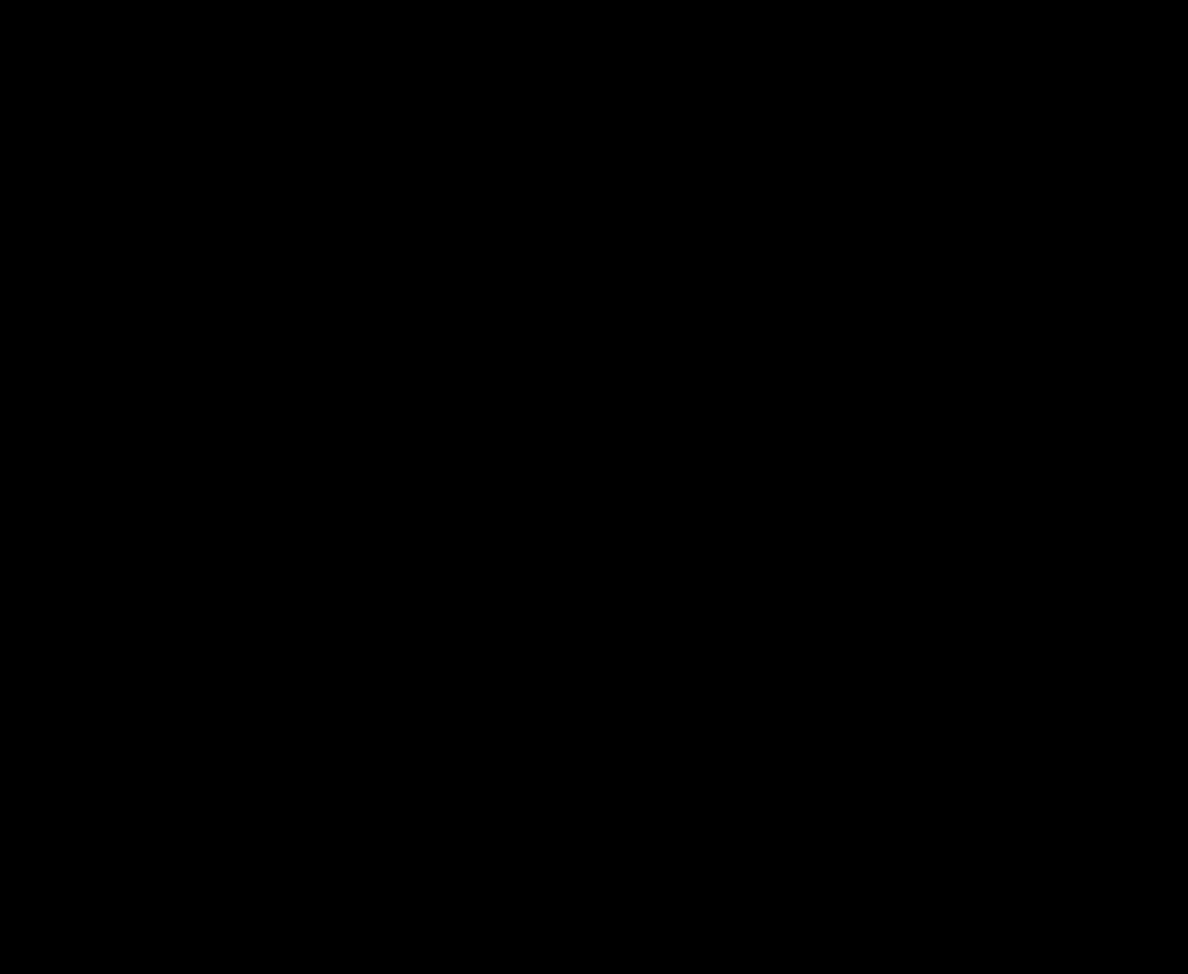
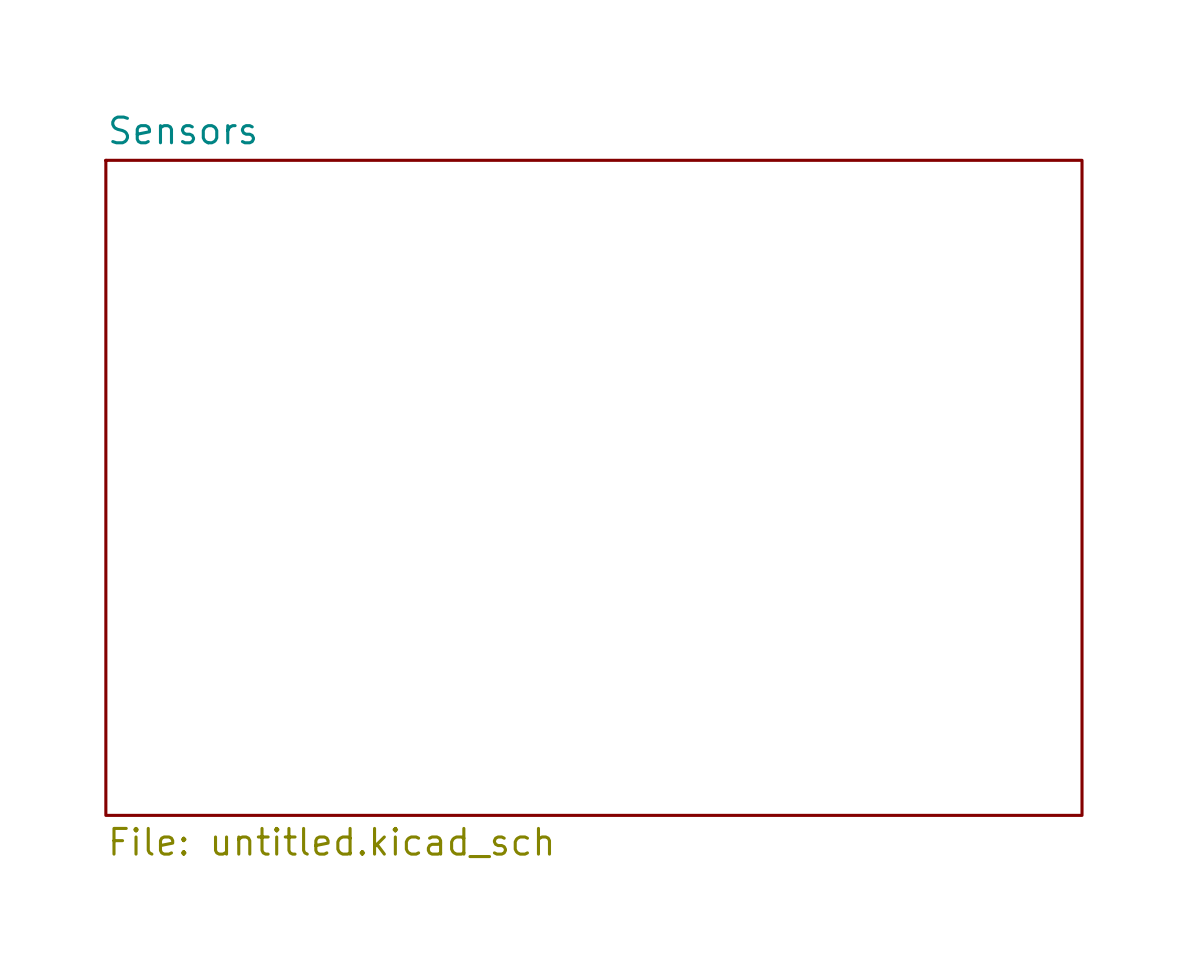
sheet Sensors: none -> File: untitled.kicad_sch (593, 487)

